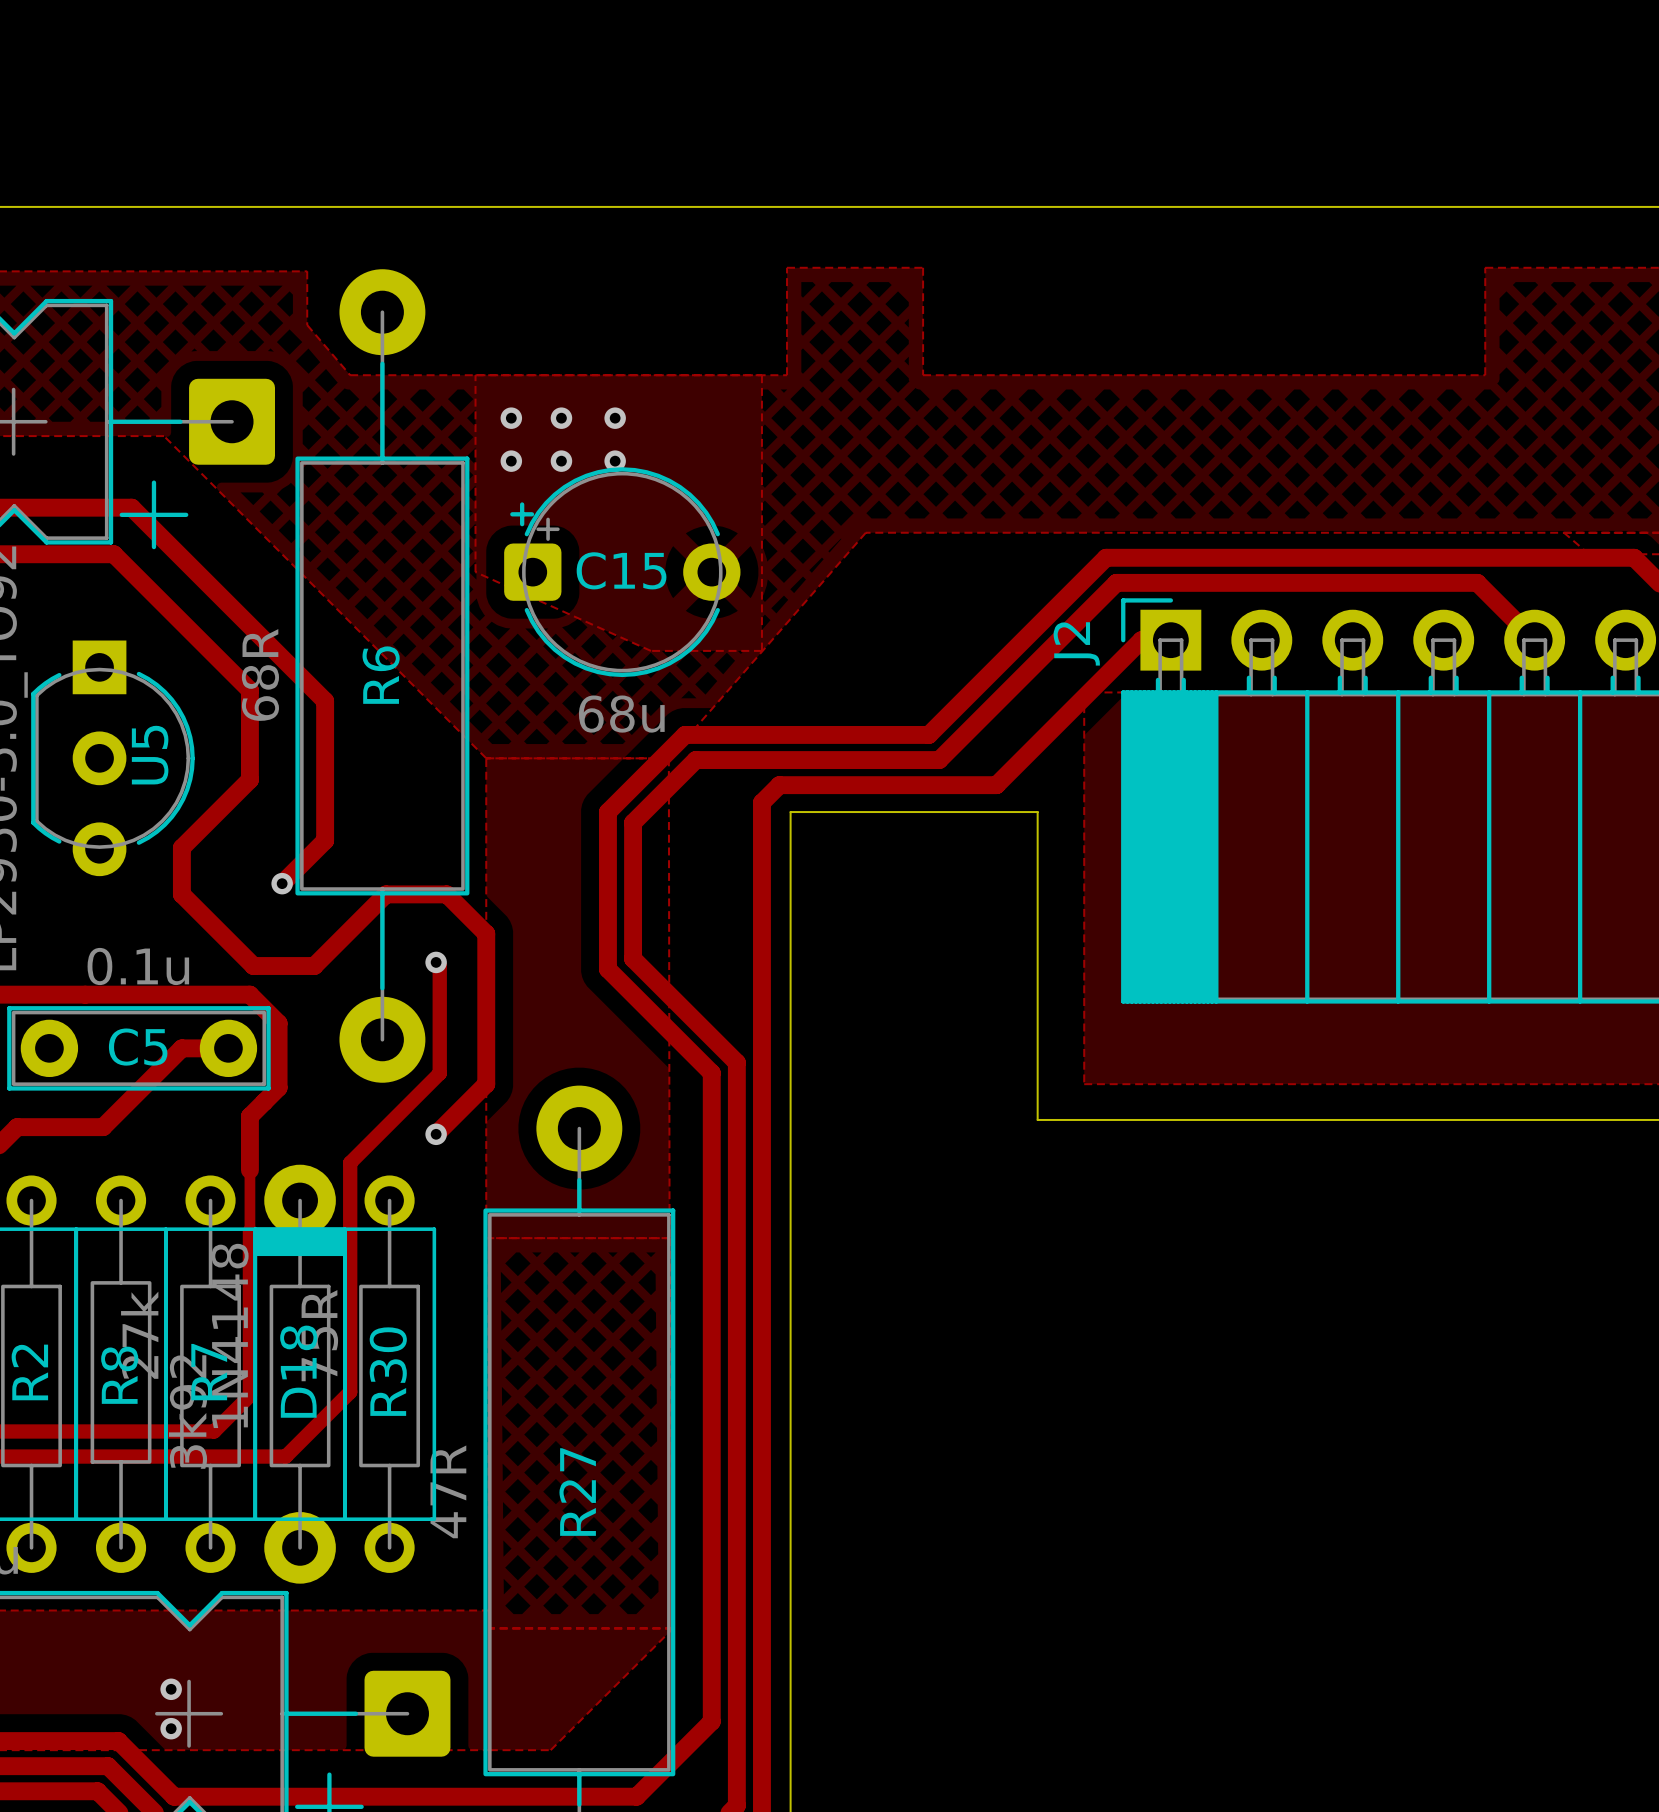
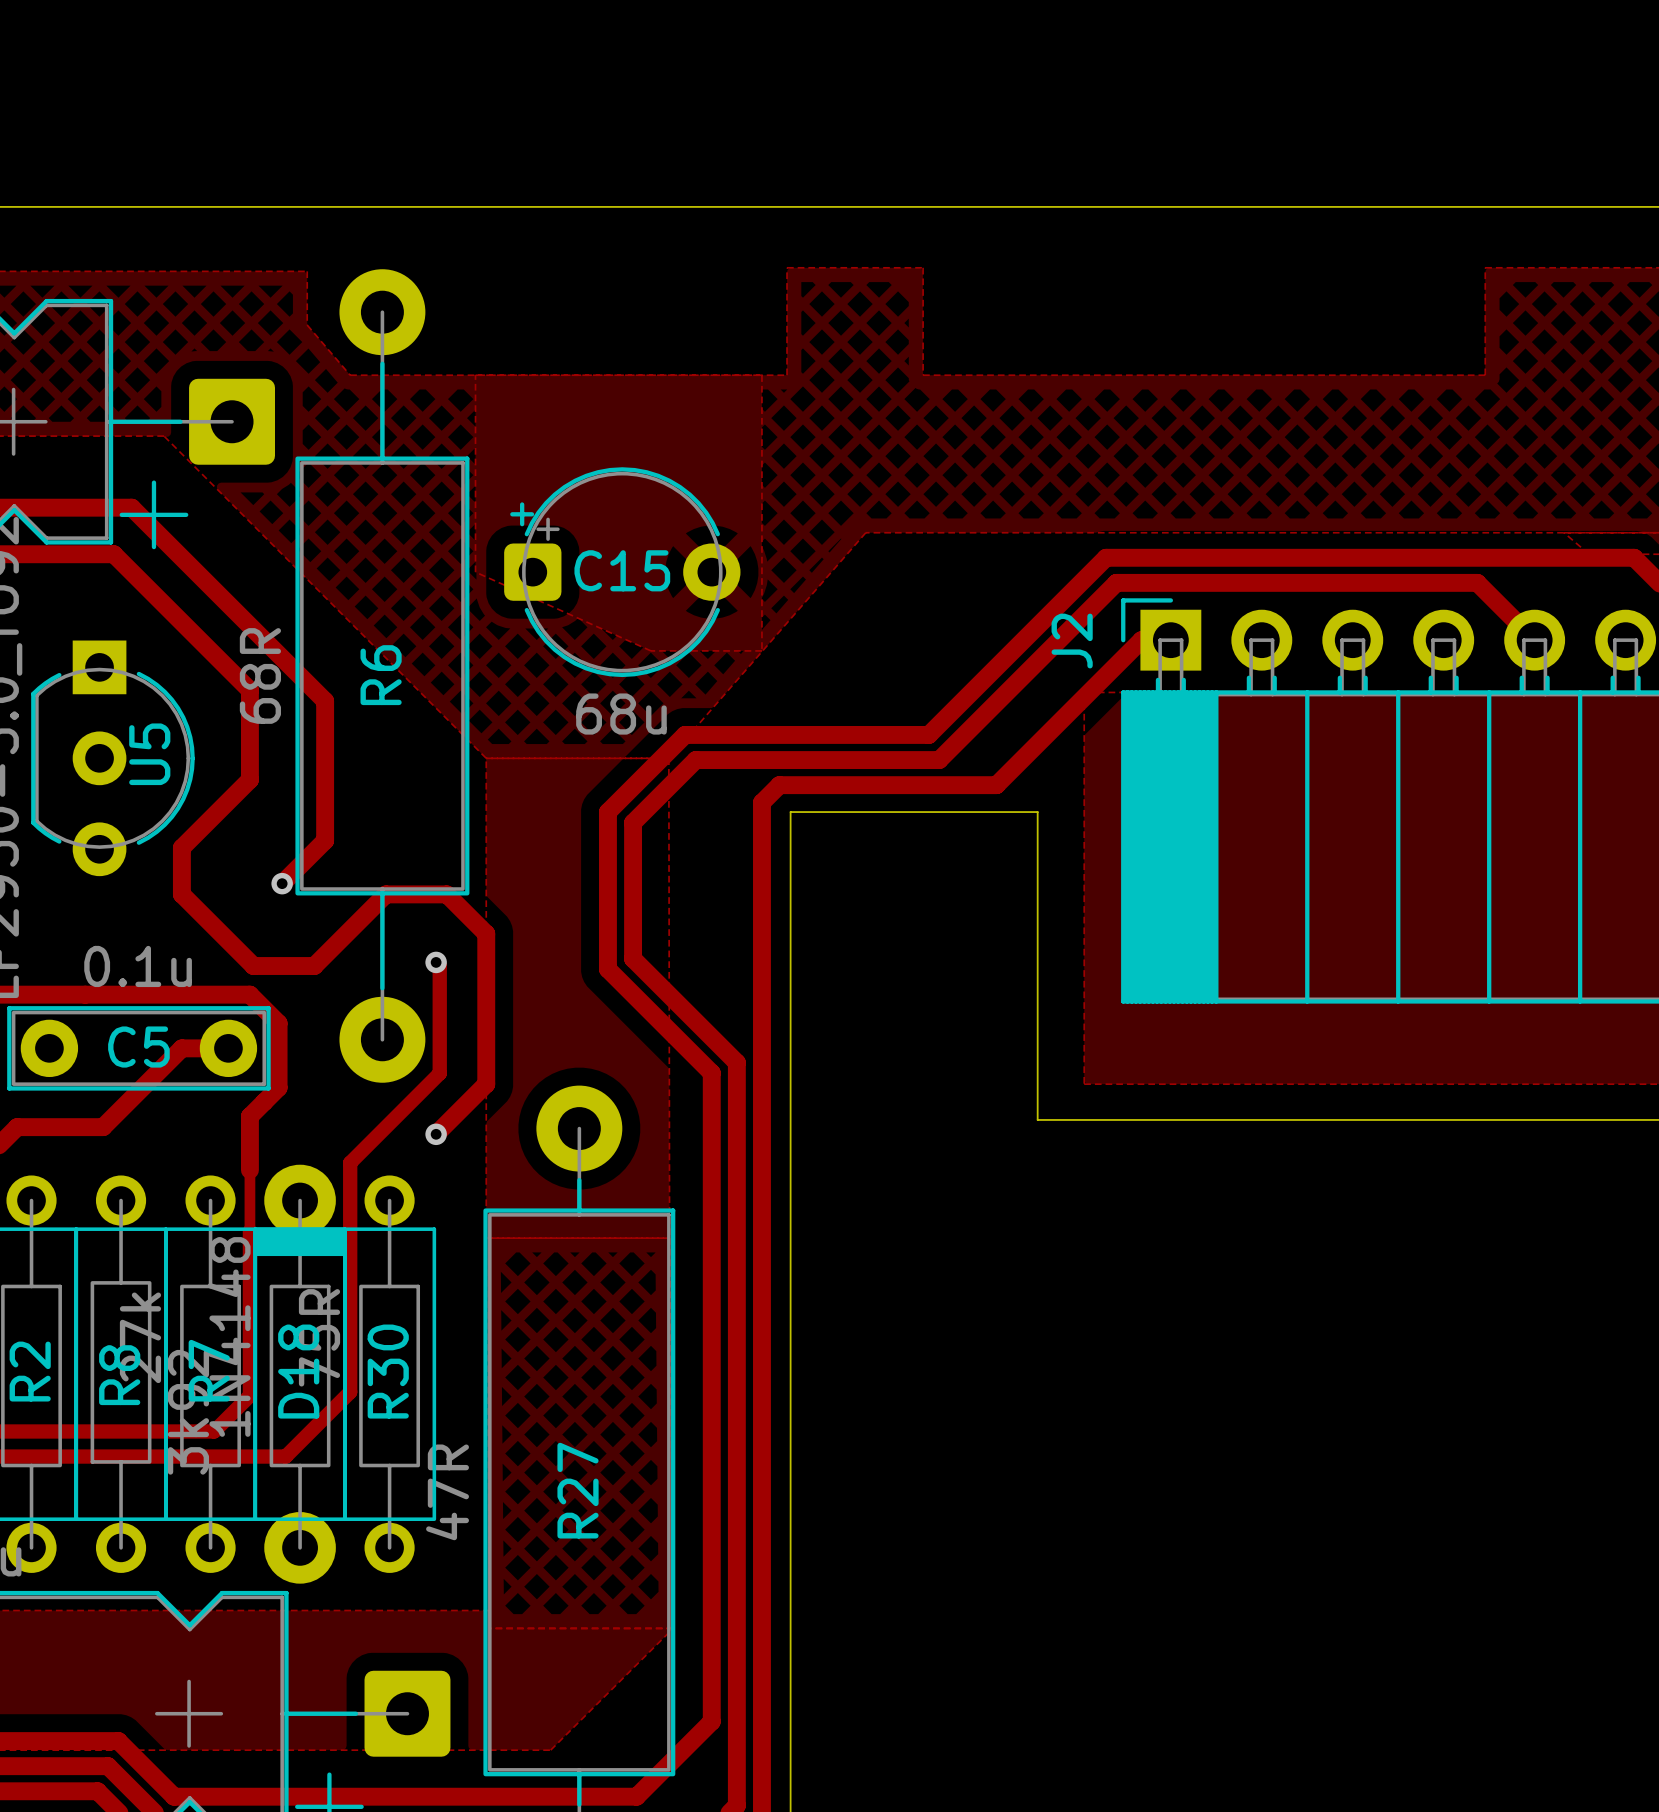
via: (511, 418) -> none
via: (561, 418) -> none
via: (615, 418) -> none
via: (511, 461) -> none
via: (561, 461) -> none
via: (615, 461) -> none
via: (171, 1689) -> none
via: (171, 1728) -> none

